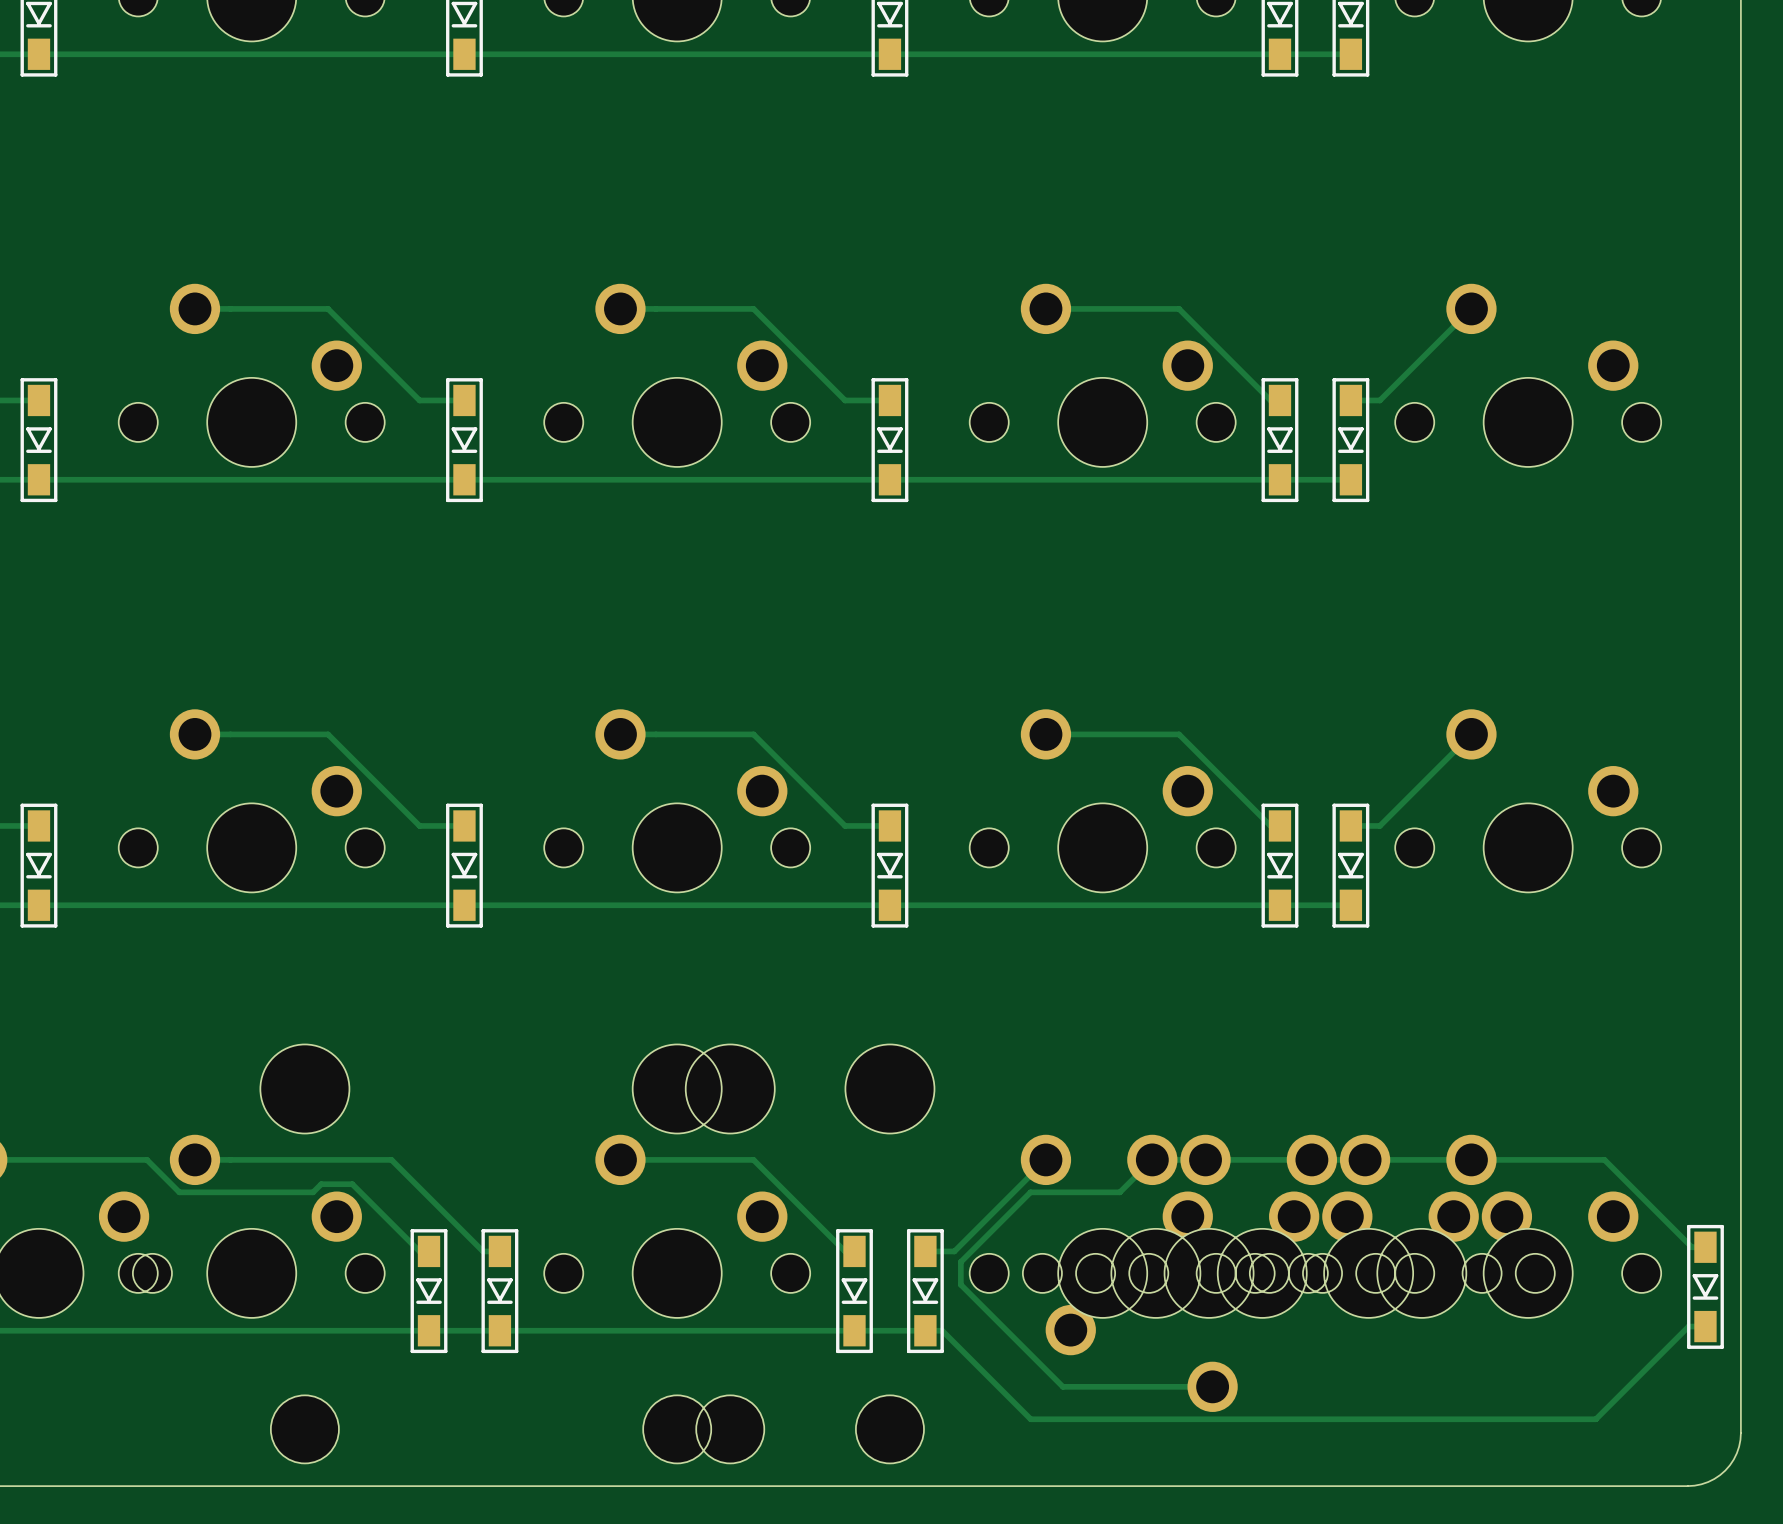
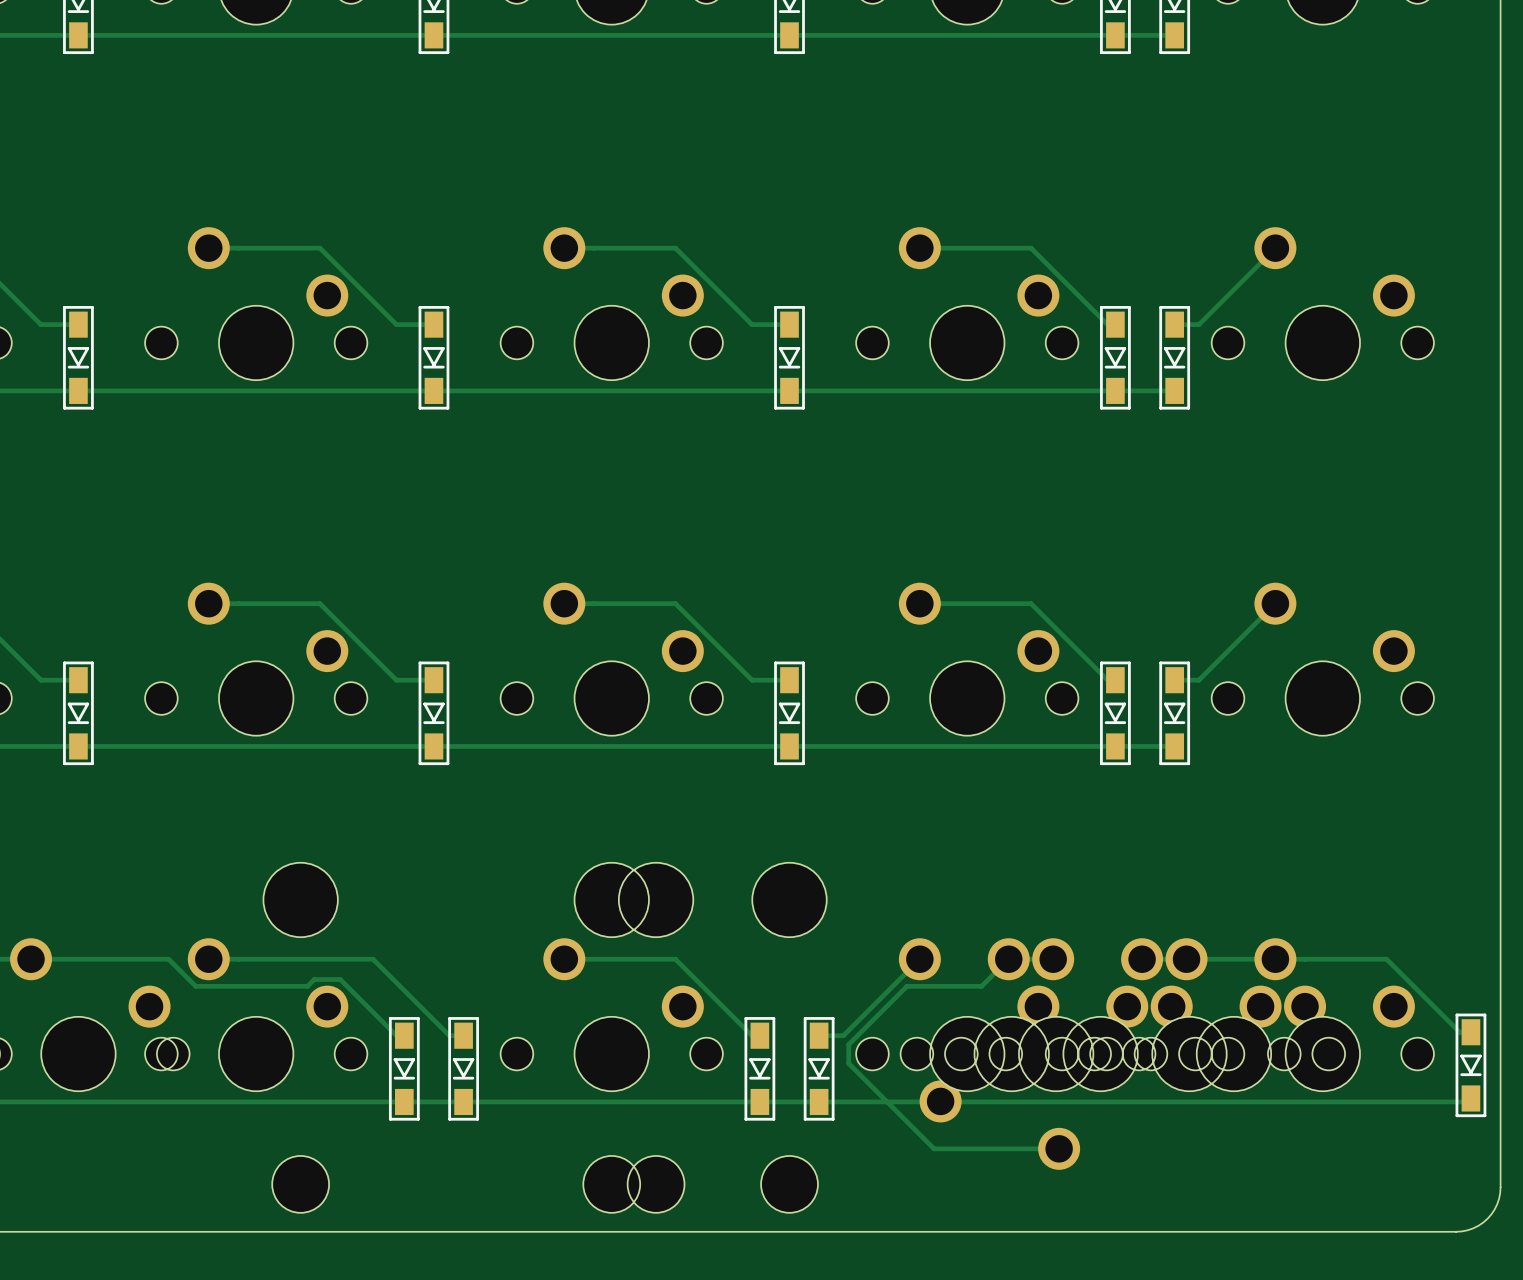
track: (1205, 1159) (1311, 1159) -> none
track: (1705, 1326) (1688, 1326) (1595, 1419) (1030, 1419) (942, 1330) -> (1470, 1101) (833, 1101)

